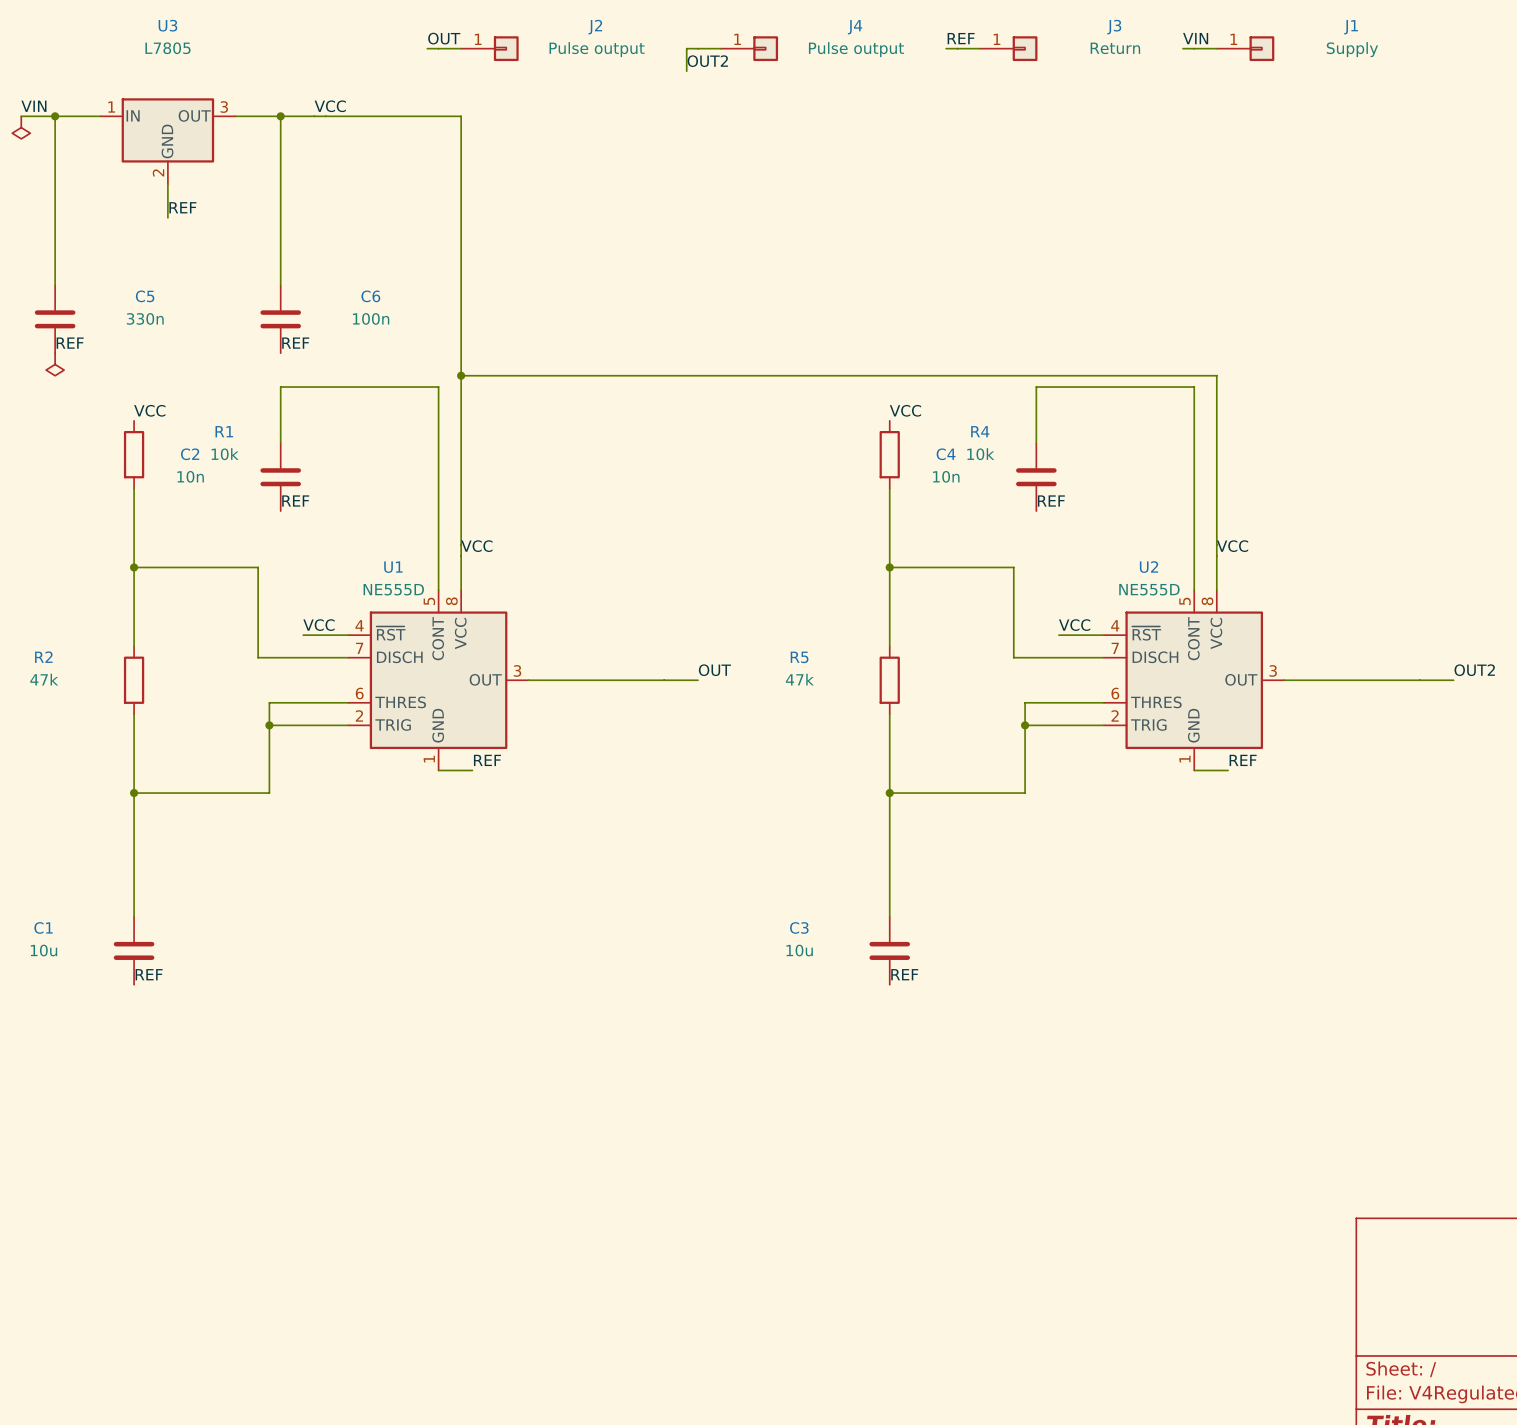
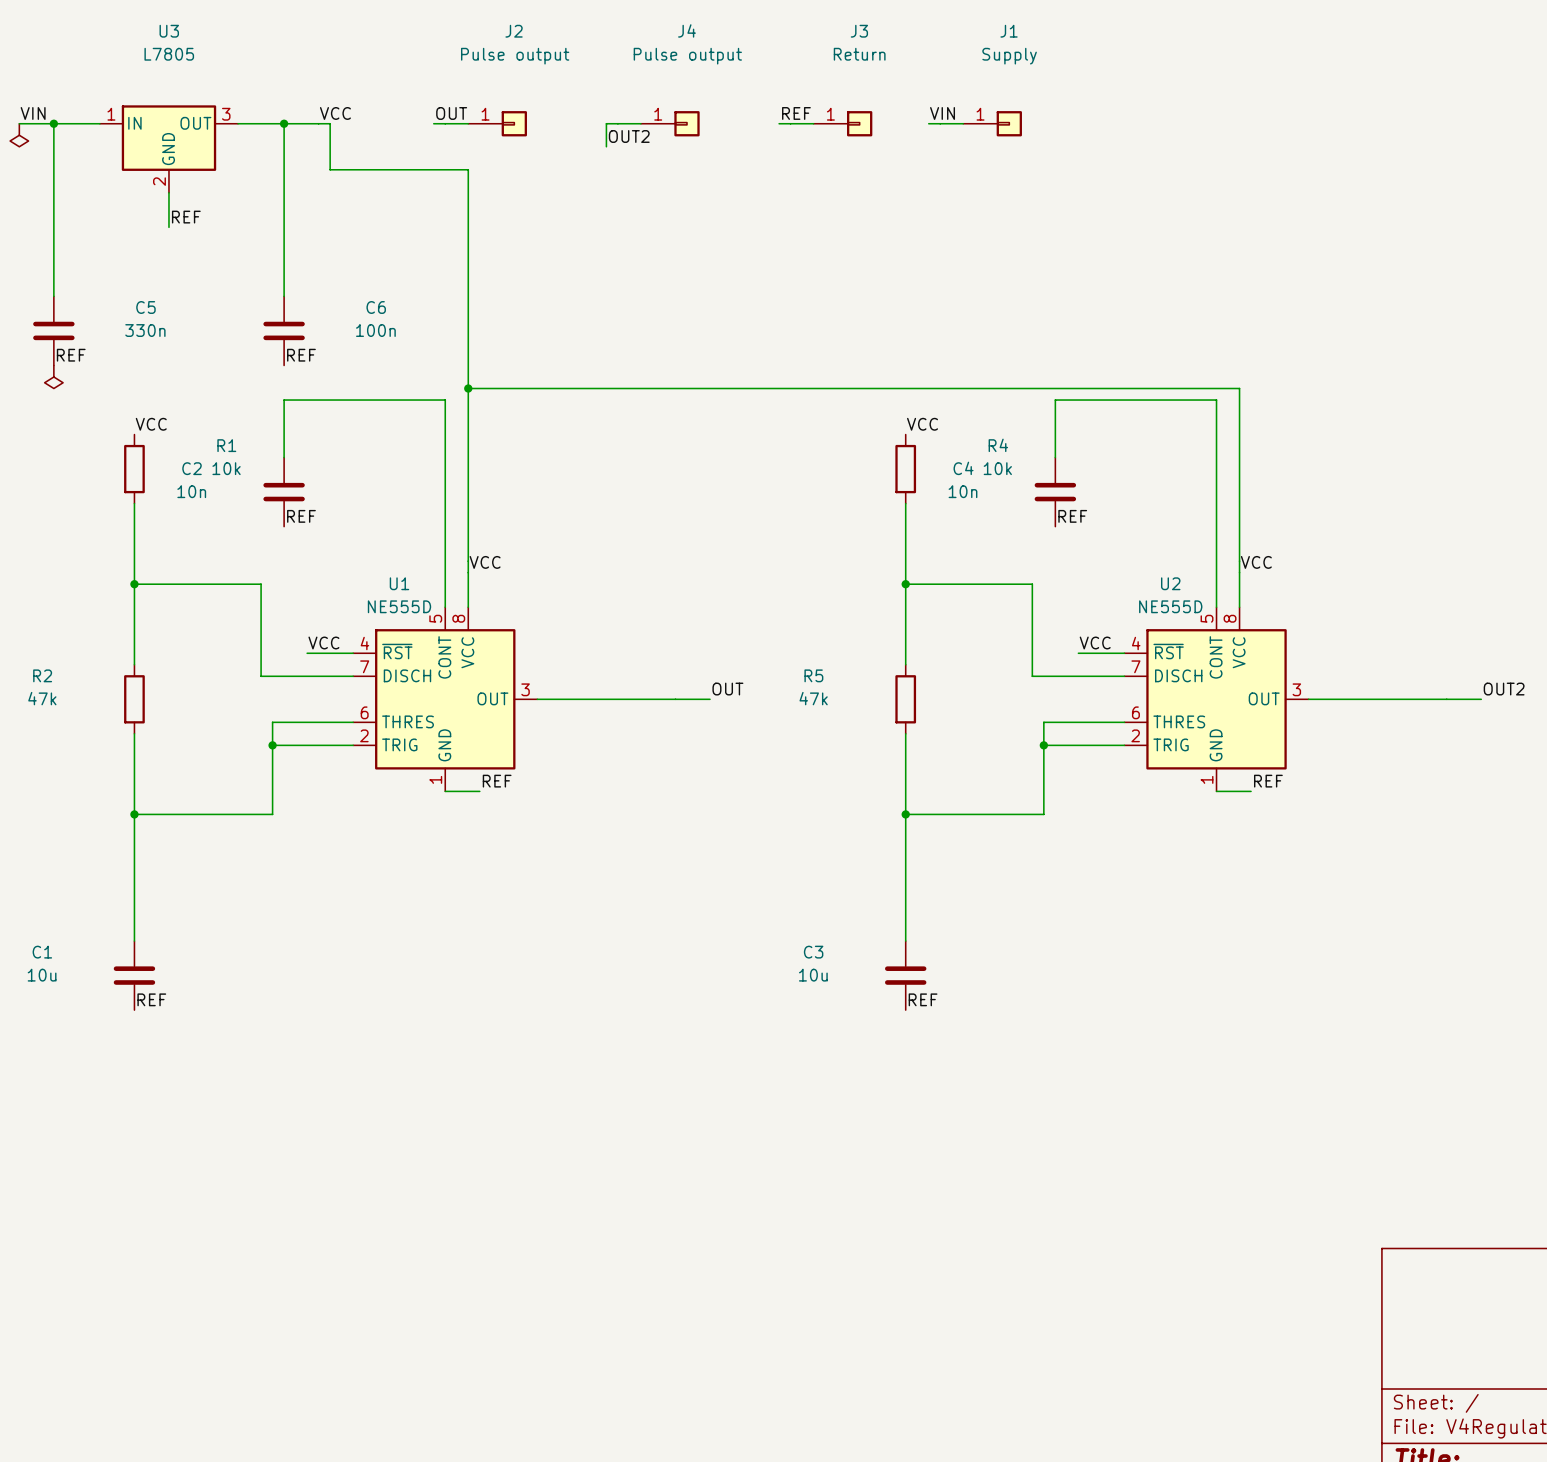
J2 name position: J2 (595, 27) -> J2 (514, 31)
J4 name position: J4 (855, 27) -> J4 (686, 30)
J3 name position: J3 (1114, 27) -> J3 (859, 31)
J1 name position: J1 (1351, 27) -> J1 (1009, 31)
label position: OUT (444, 38) -> OUT (451, 113)
label position: REF (961, 38) -> REF (796, 113)
label: VIN (1195, 38) -> none
wire: (427, 48) (461, 48) -> none
J2 position: (489, 48) -> (497, 123)
wire: (720, 48) (686, 48) (686, 71) -> (640, 123) (606, 123) (606, 146)
J4 position: (749, 48) -> (670, 123)
wire: (946, 48) (979, 48) -> (928, 123) (963, 123)
J3 position: (1008, 48) -> (842, 123)
J3 value position: Return (1115, 48) -> Return (859, 54)
wire: (1182, 48) (1216, 48) -> none
J1 position: (1245, 48) -> (992, 123)
J2 value position: Pulse output (597, 49) -> Pulse output (515, 56)
J4 value position: Pulse output (856, 49) -> Pulse output (687, 56)
J1 value position: Supply (1352, 49) -> Supply (1009, 56)
label position: OUT2 (707, 61) -> OUT2 (629, 136)
label: none -> VIN (942, 113)
wire: (325, 116) (427, 116) -> (330, 123) (330, 169) (468, 169)
wire: (461, 116) (461, 161) -> none
wire: none -> (779, 123) (813, 123)

